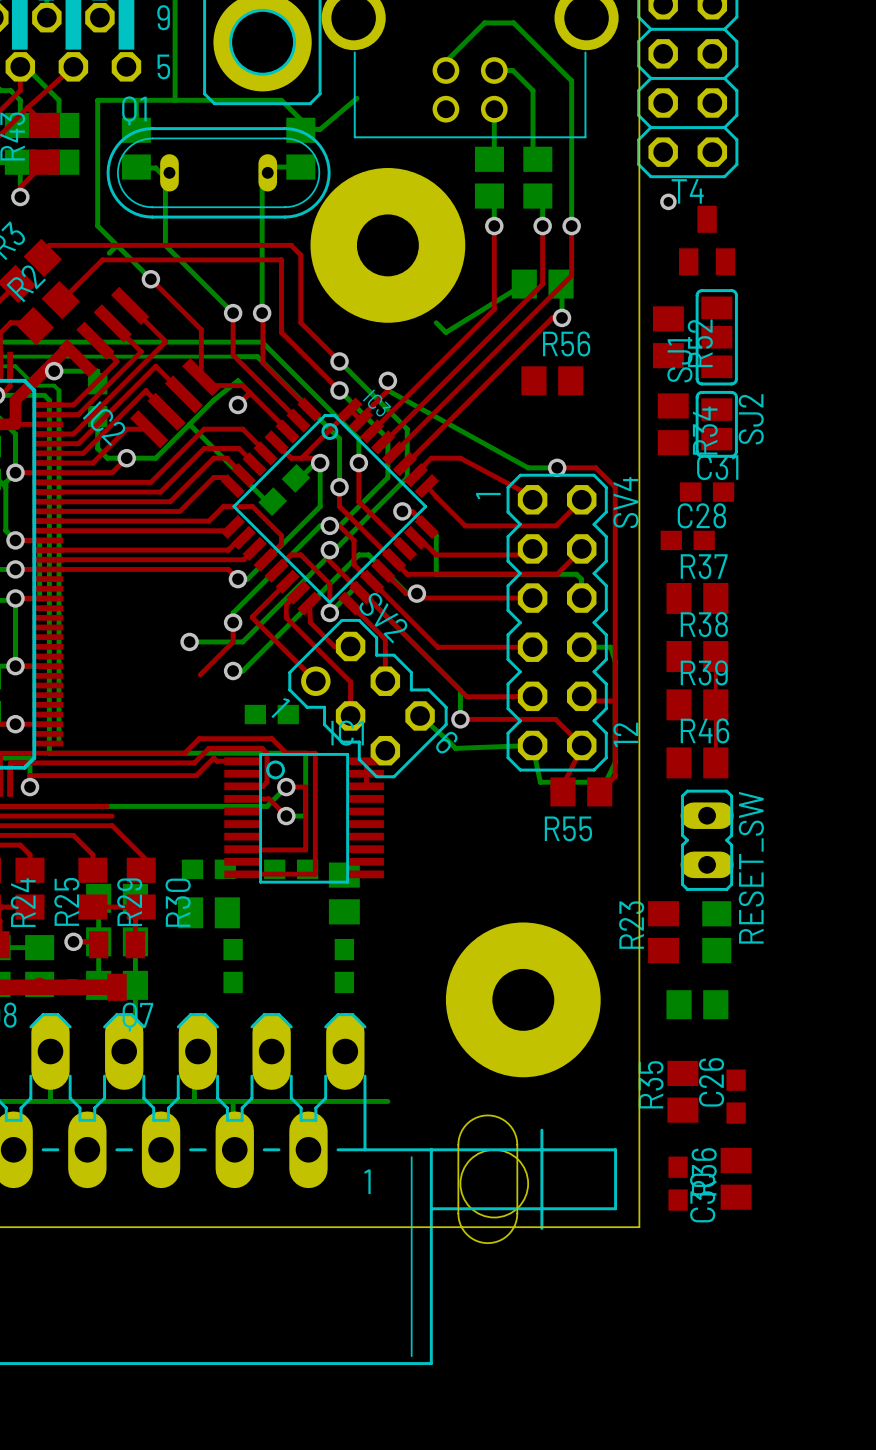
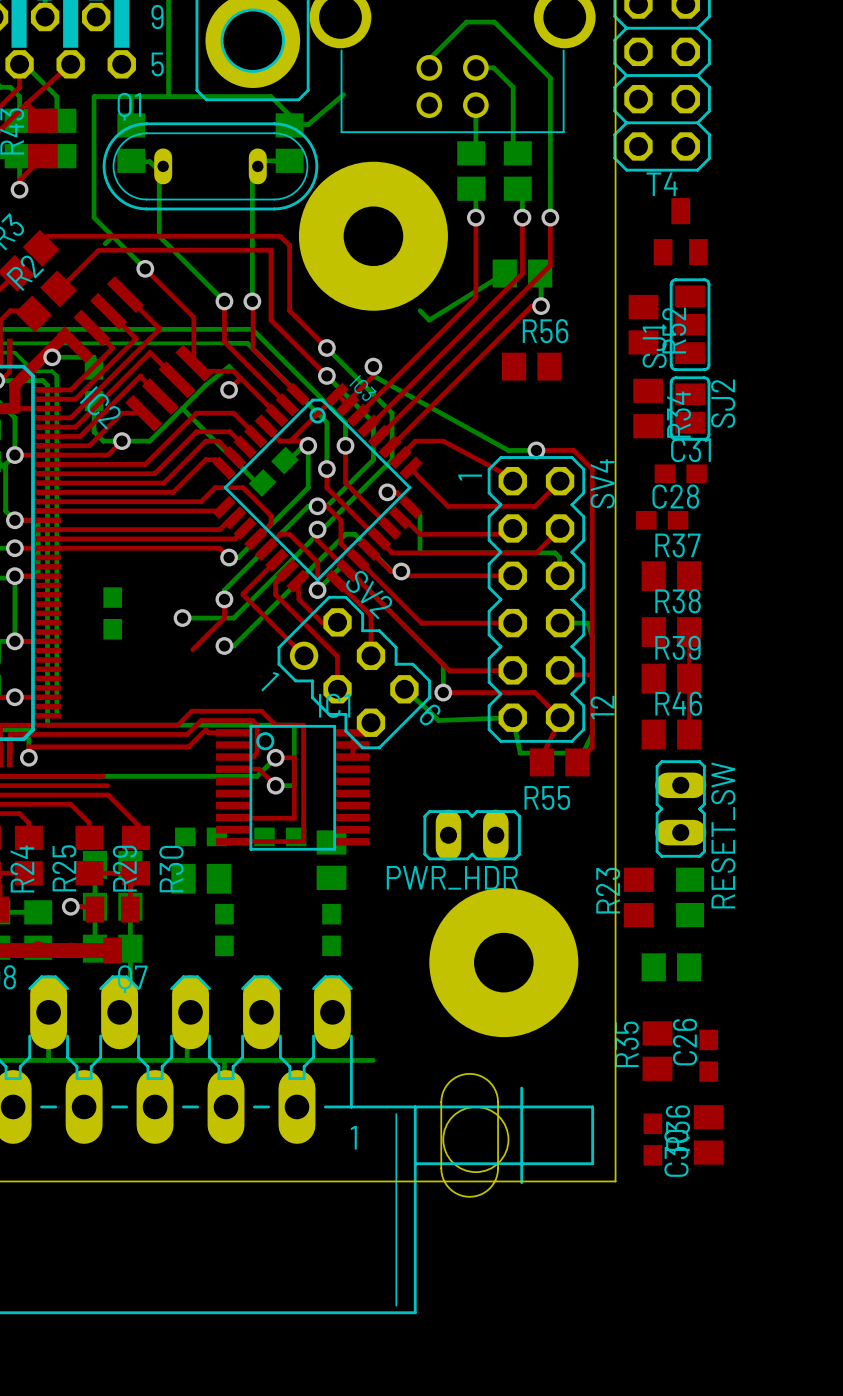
via: (668, 201) -> none
part rotation: 0° (271, 714) -> 90° clockwise (112, 613)
part position: (271, 714) -> (112, 613)
PWR_HDR: none -> (472, 835)

